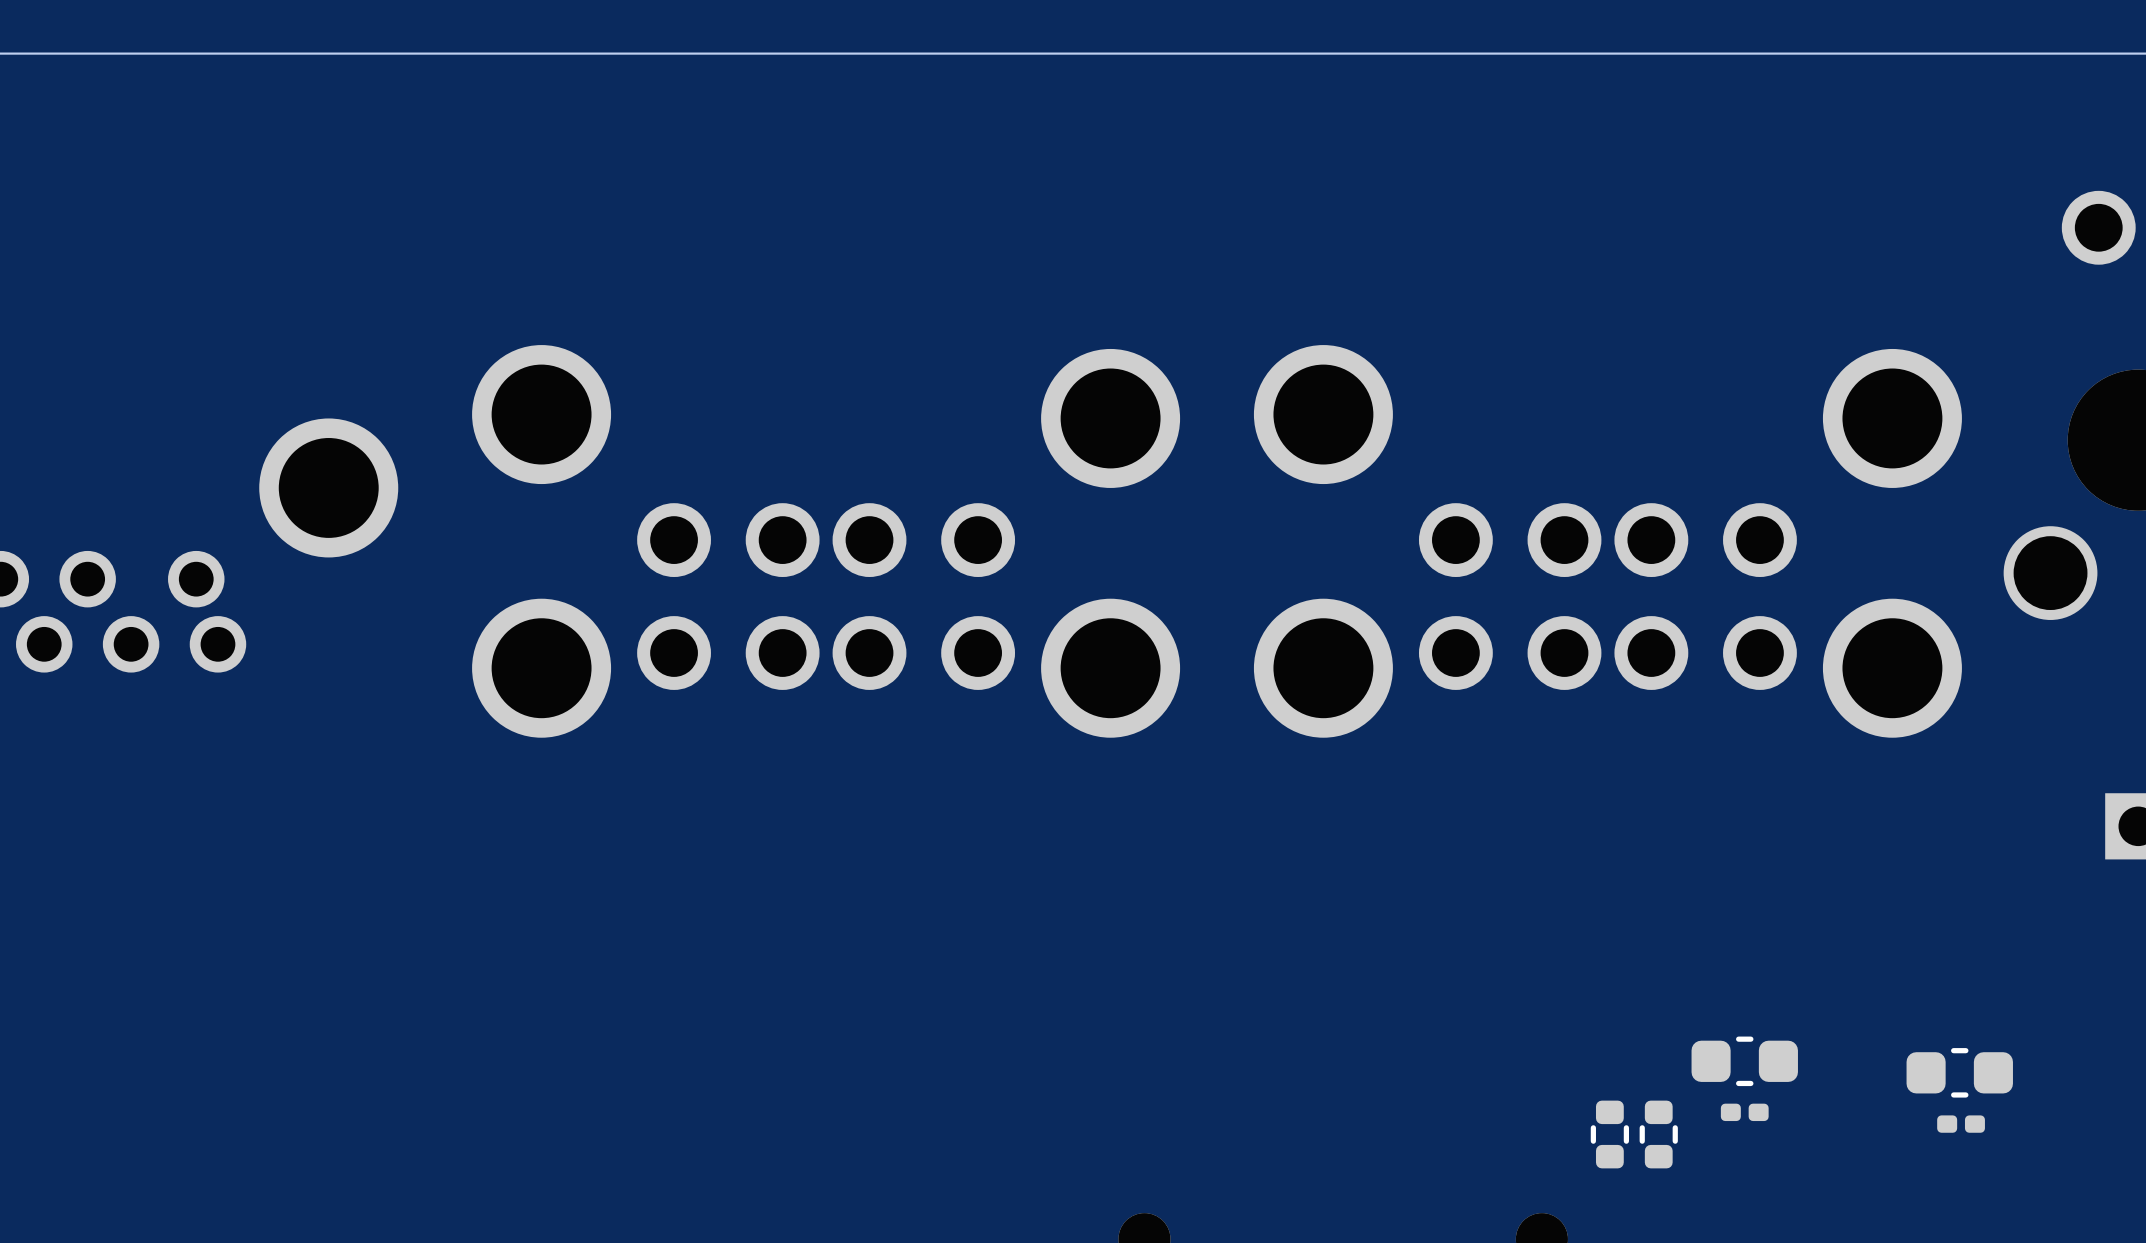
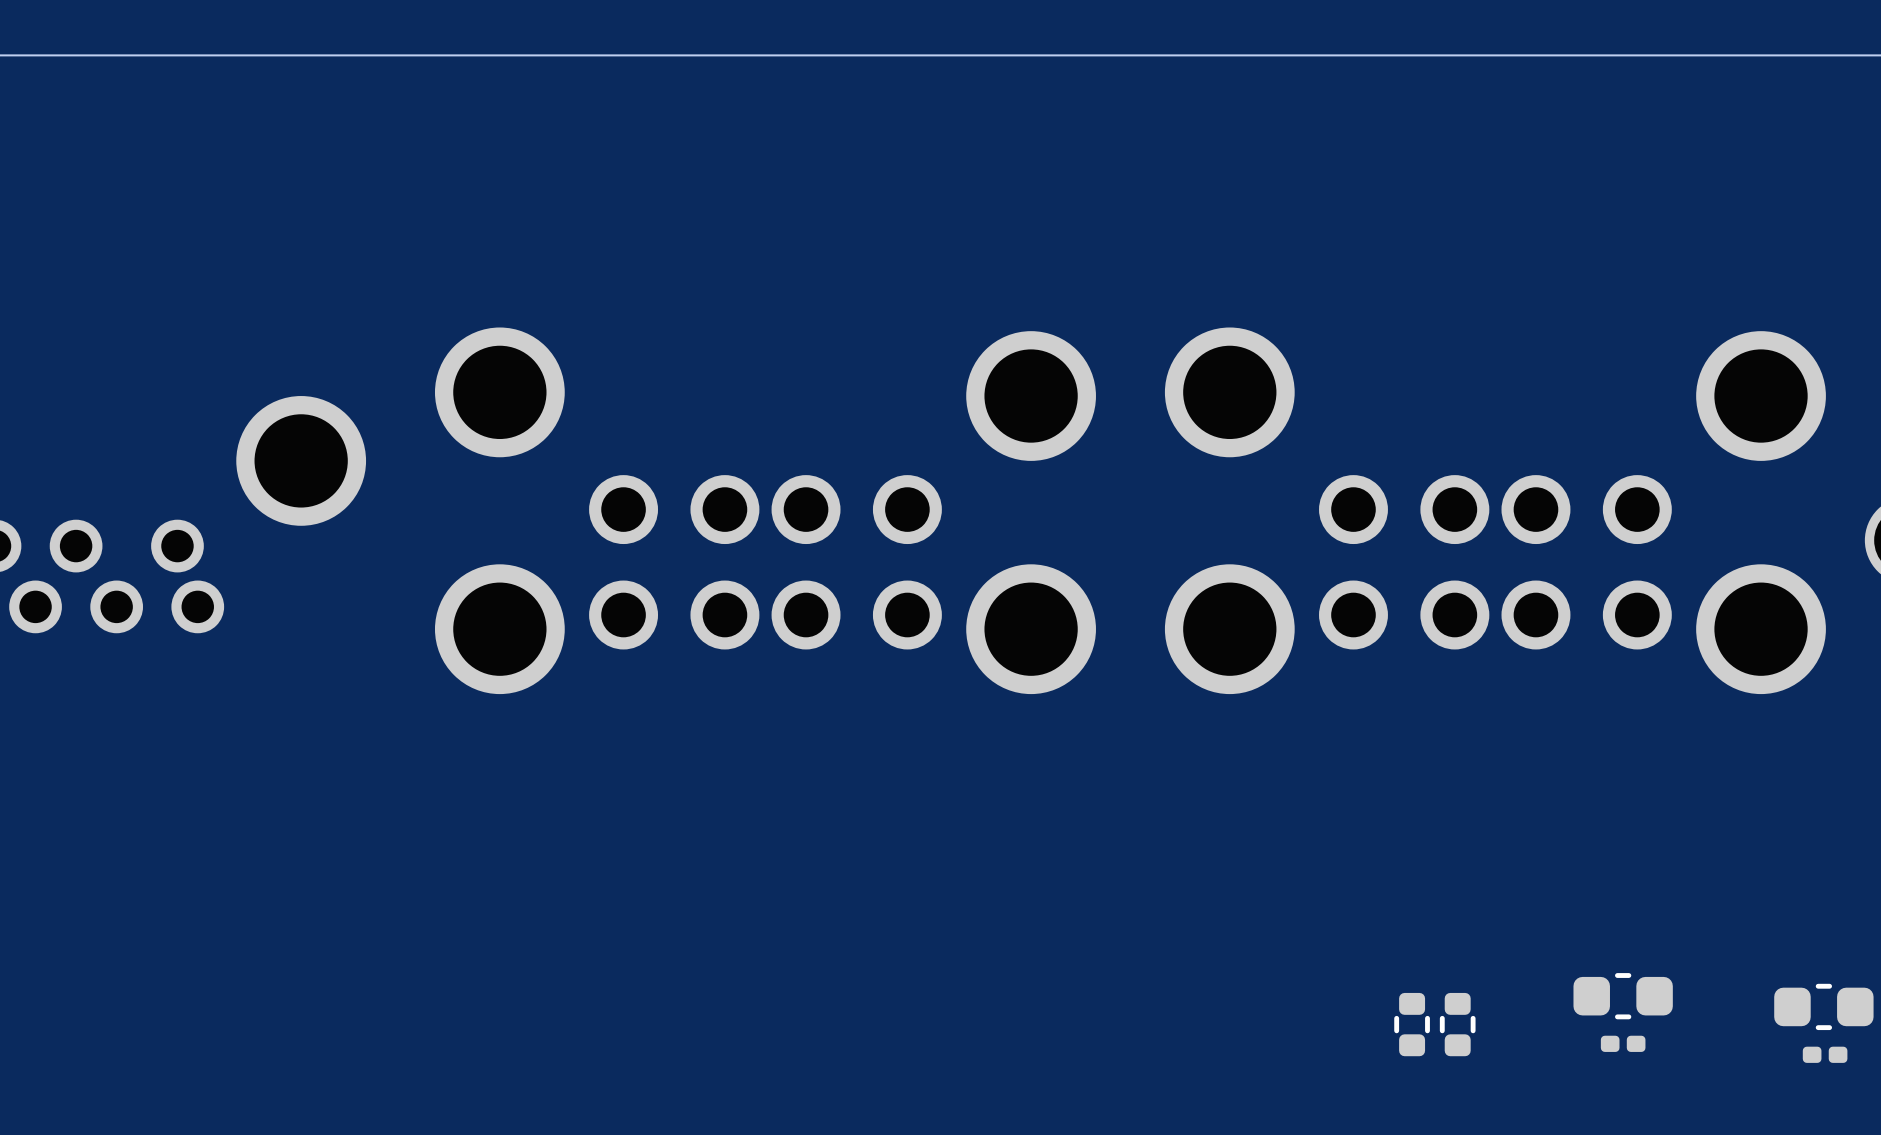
part: none -> (1412, 1024)
part: none -> (1457, 1024)
part: (1609, 1134) -> none
part: (1658, 1134) -> none

